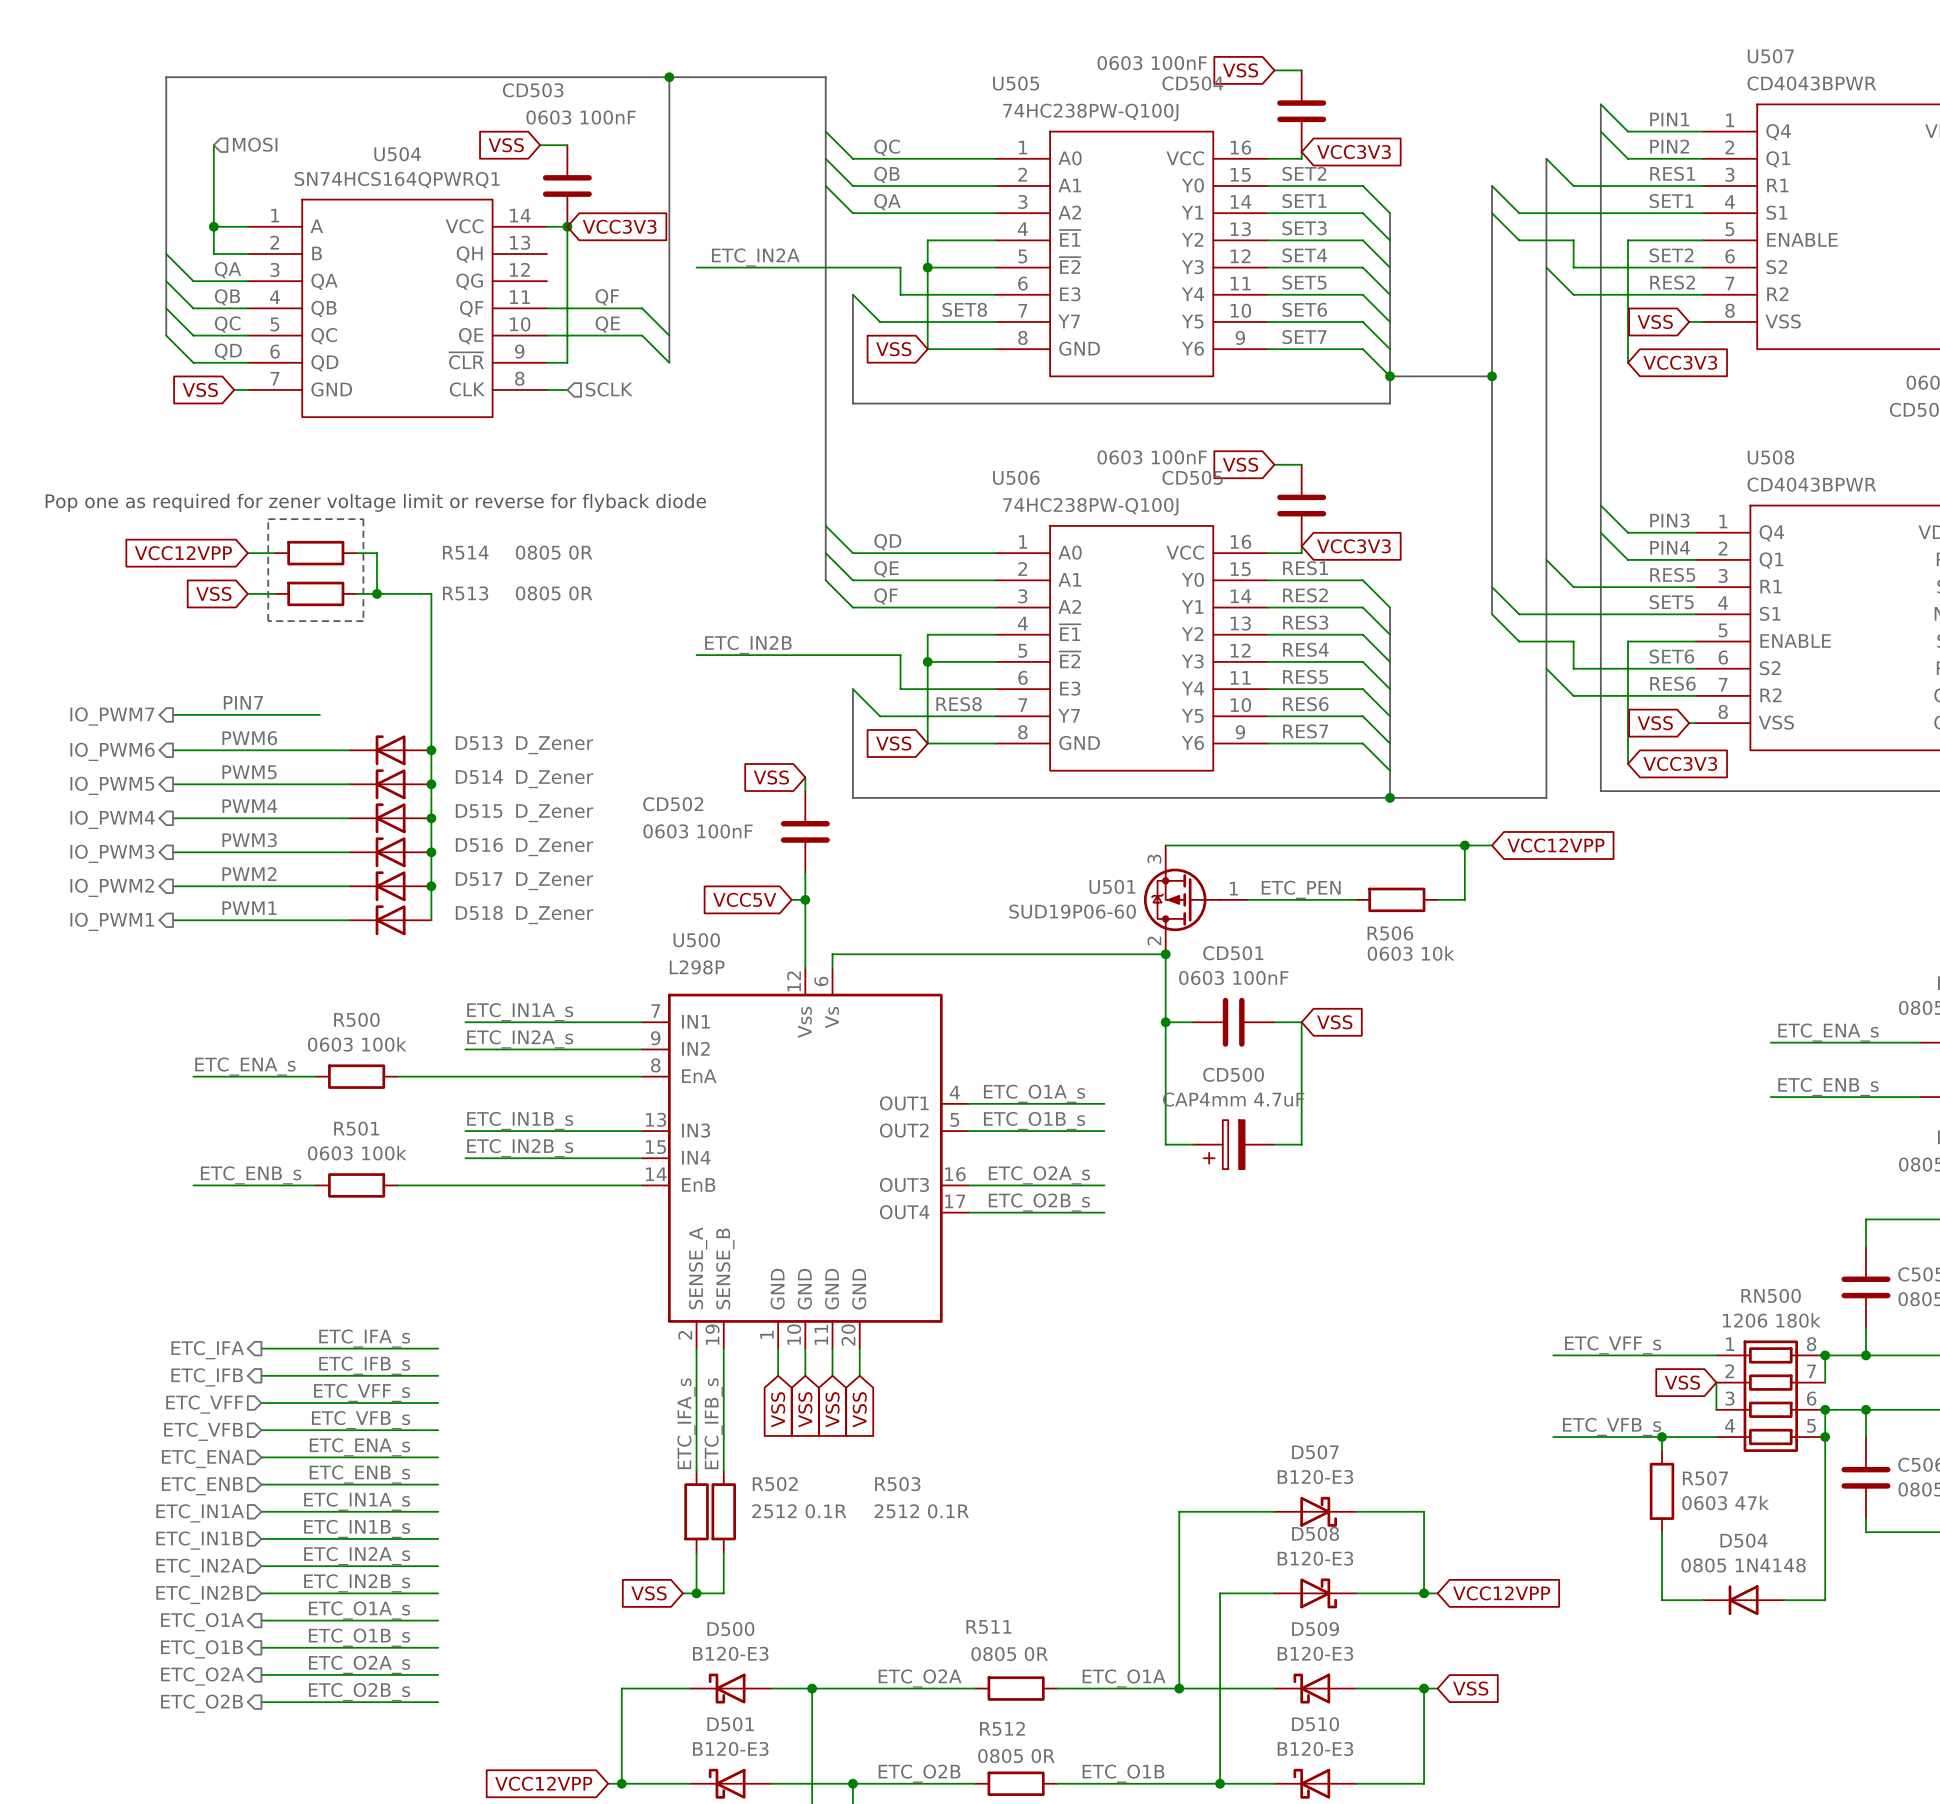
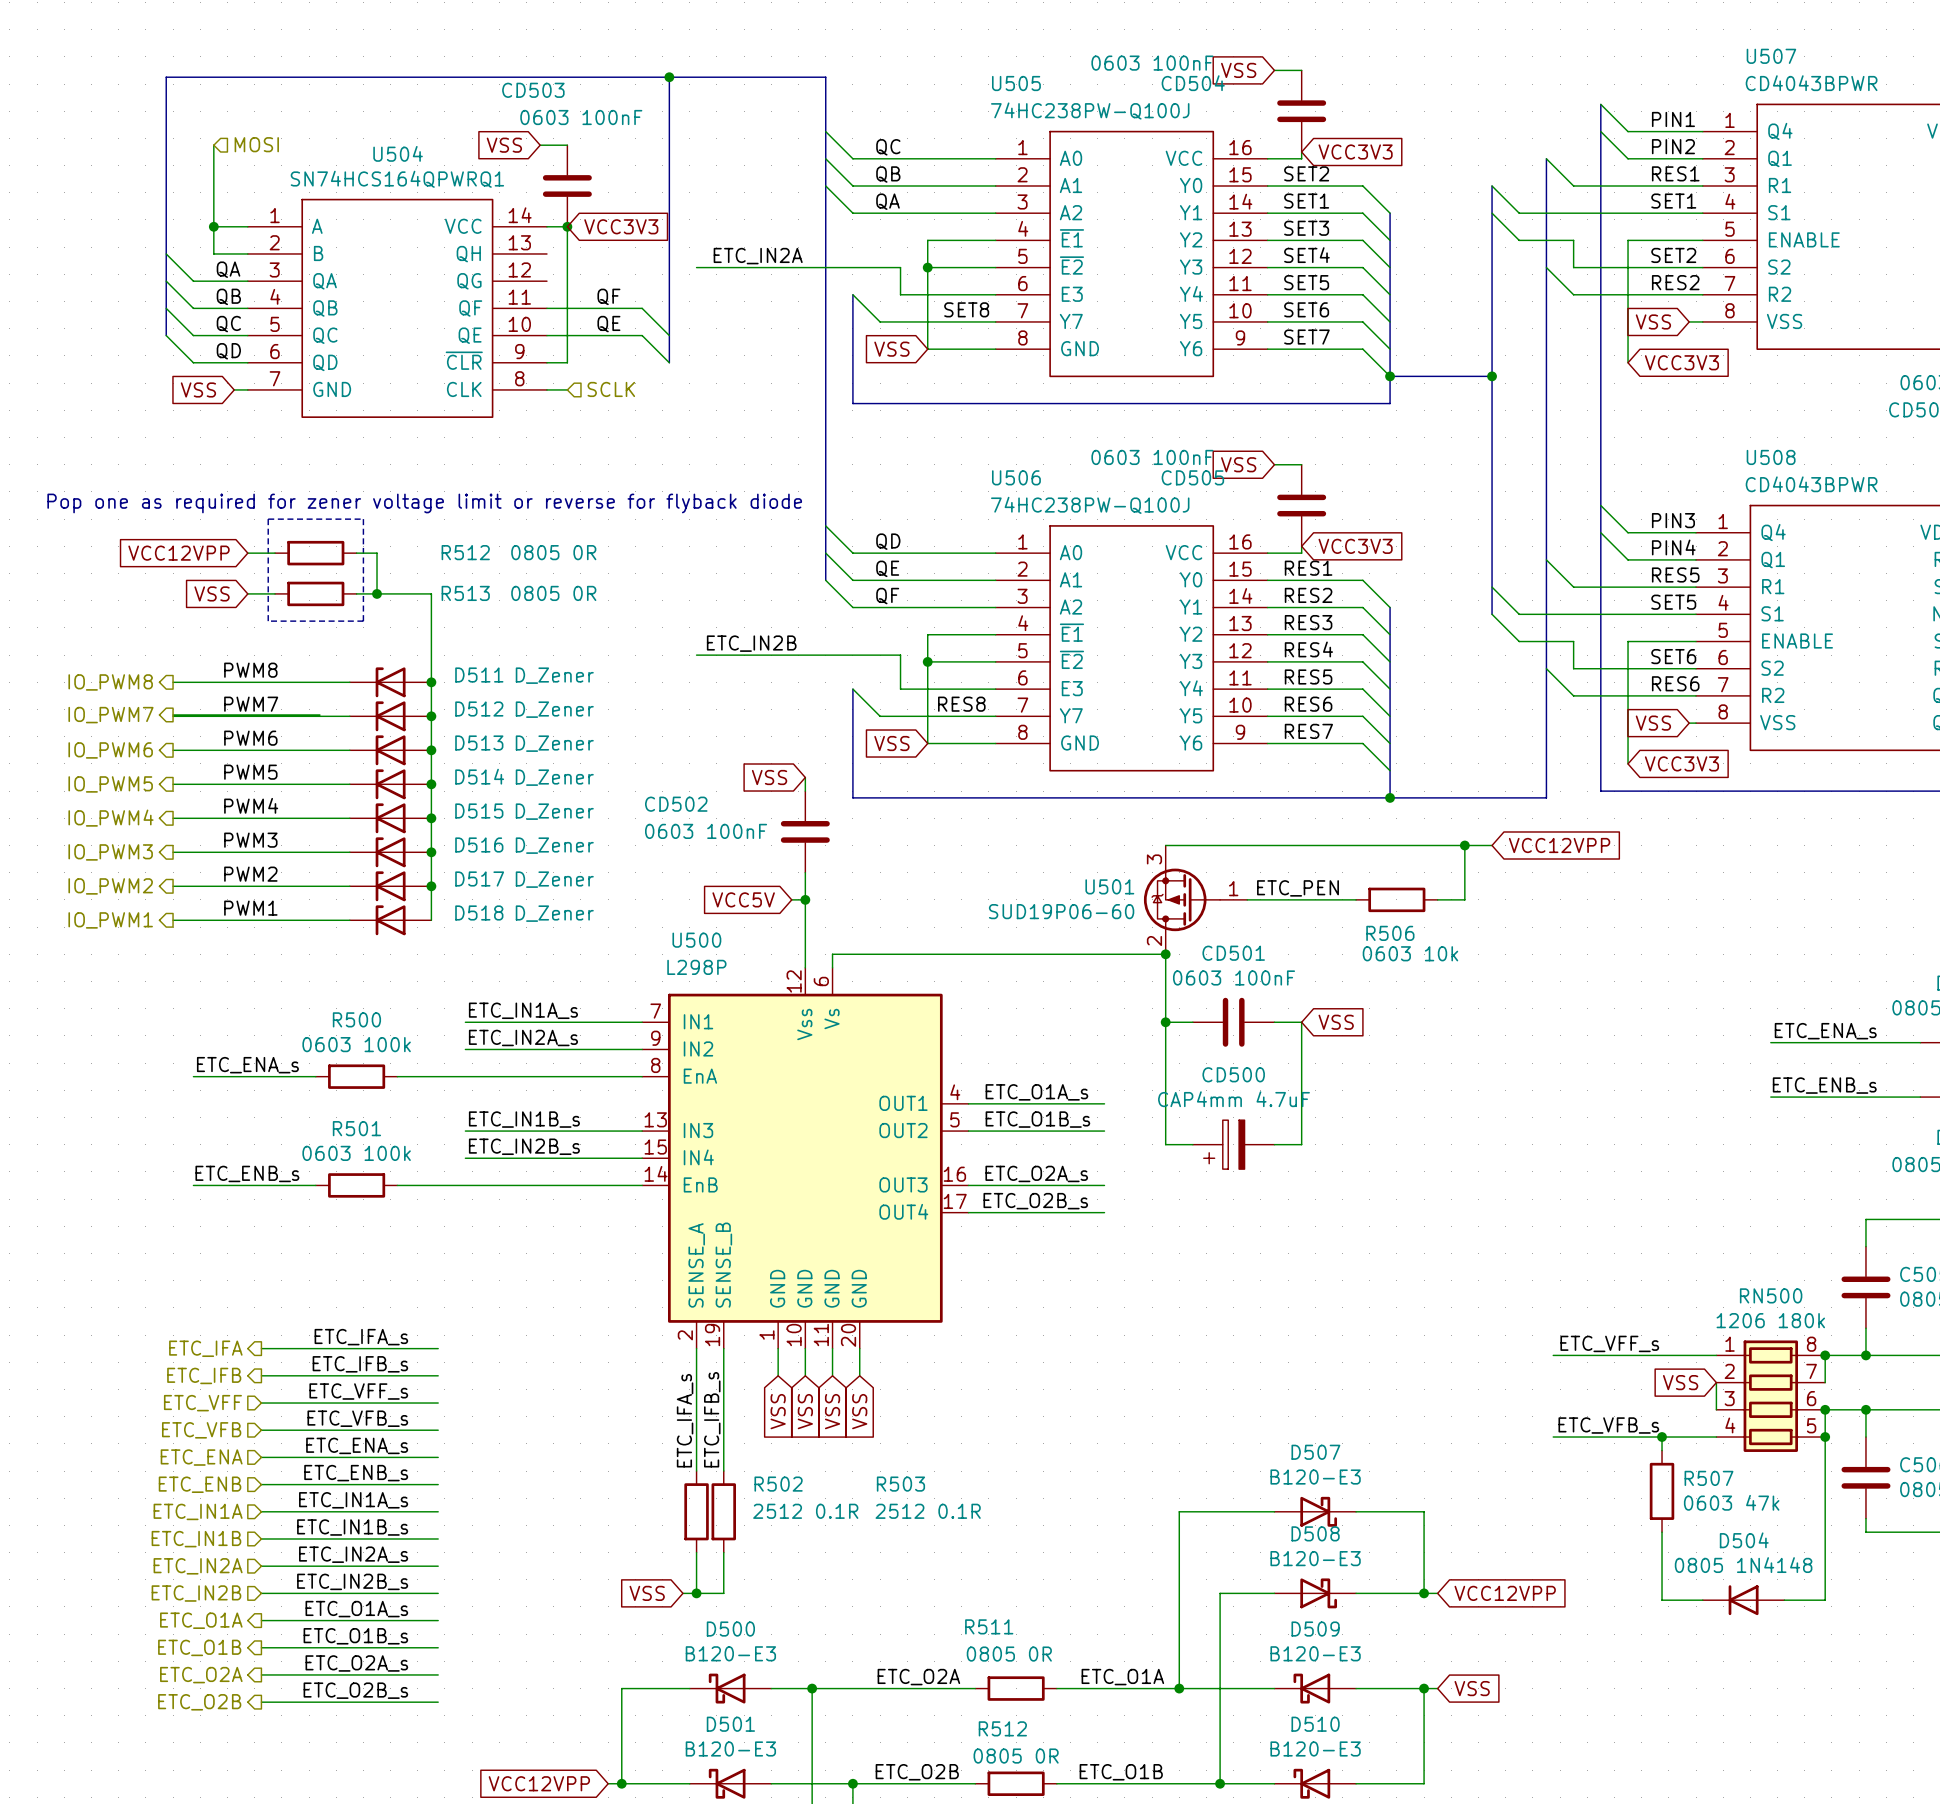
R514 name: R514 (465, 552) -> R512 (465, 552)
label: none -> PWM8 (250, 670)
wire: none -> (173, 682) (349, 682)
D511: none -> D_Zener (390, 682)
junction: none -> (431, 682)
hierarchical label: none -> IO_PWM8 (110, 682)
label: PIN7 (243, 702) -> PWM7 (251, 704)
wire: none -> (173, 716) (349, 716)
D512: none -> D_Zener (390, 716)
junction: none -> (431, 716)

